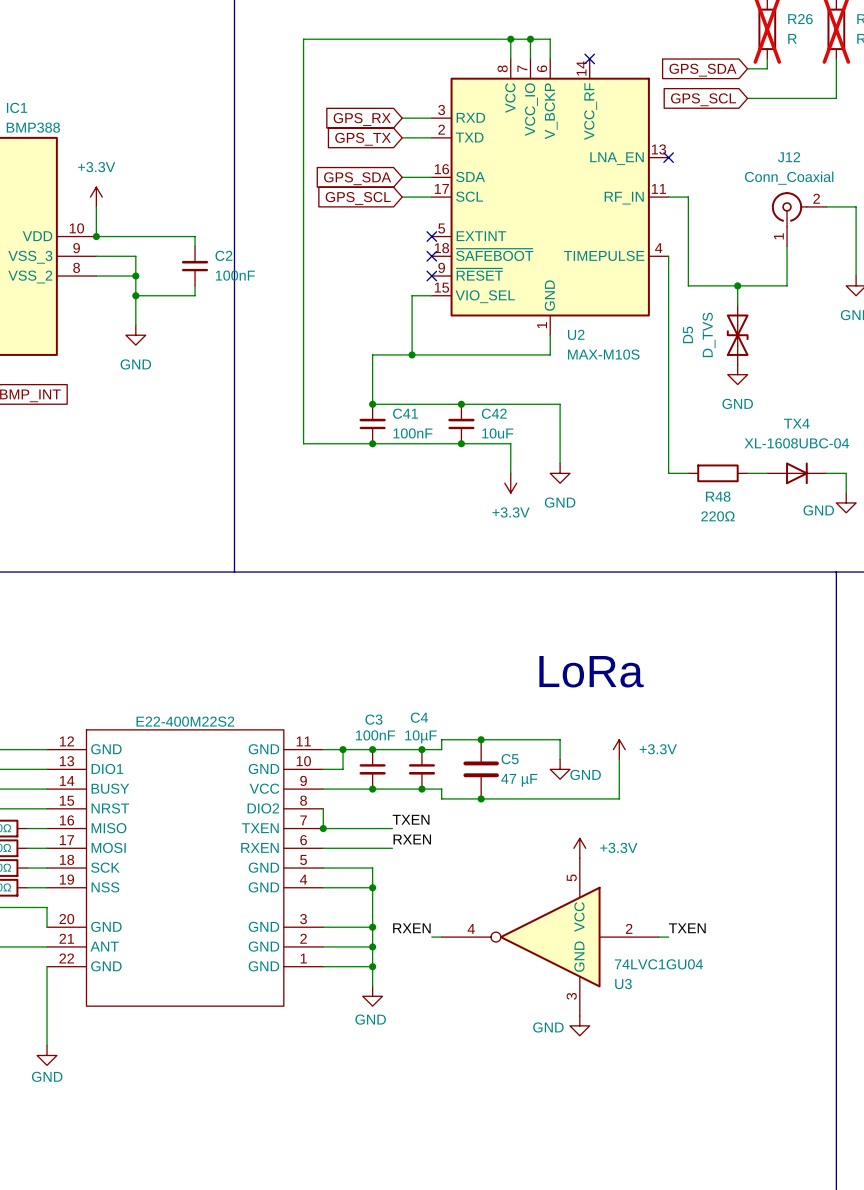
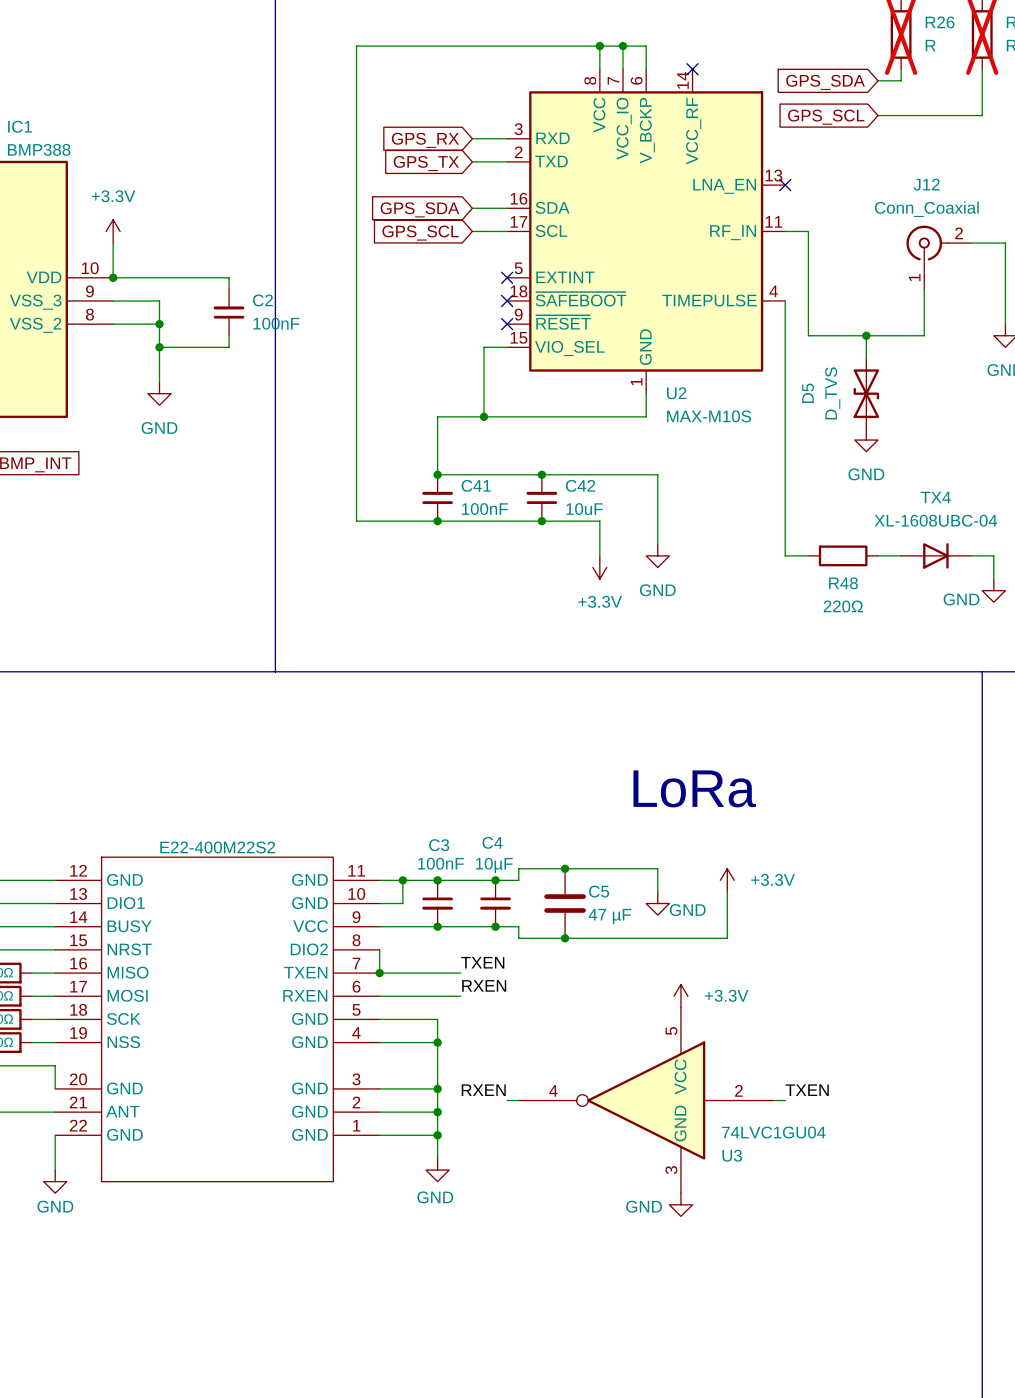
wire: (47, 996) (47, 1045) -> none
power symbol position: GND (47, 1055) -> GND (55, 1181)

